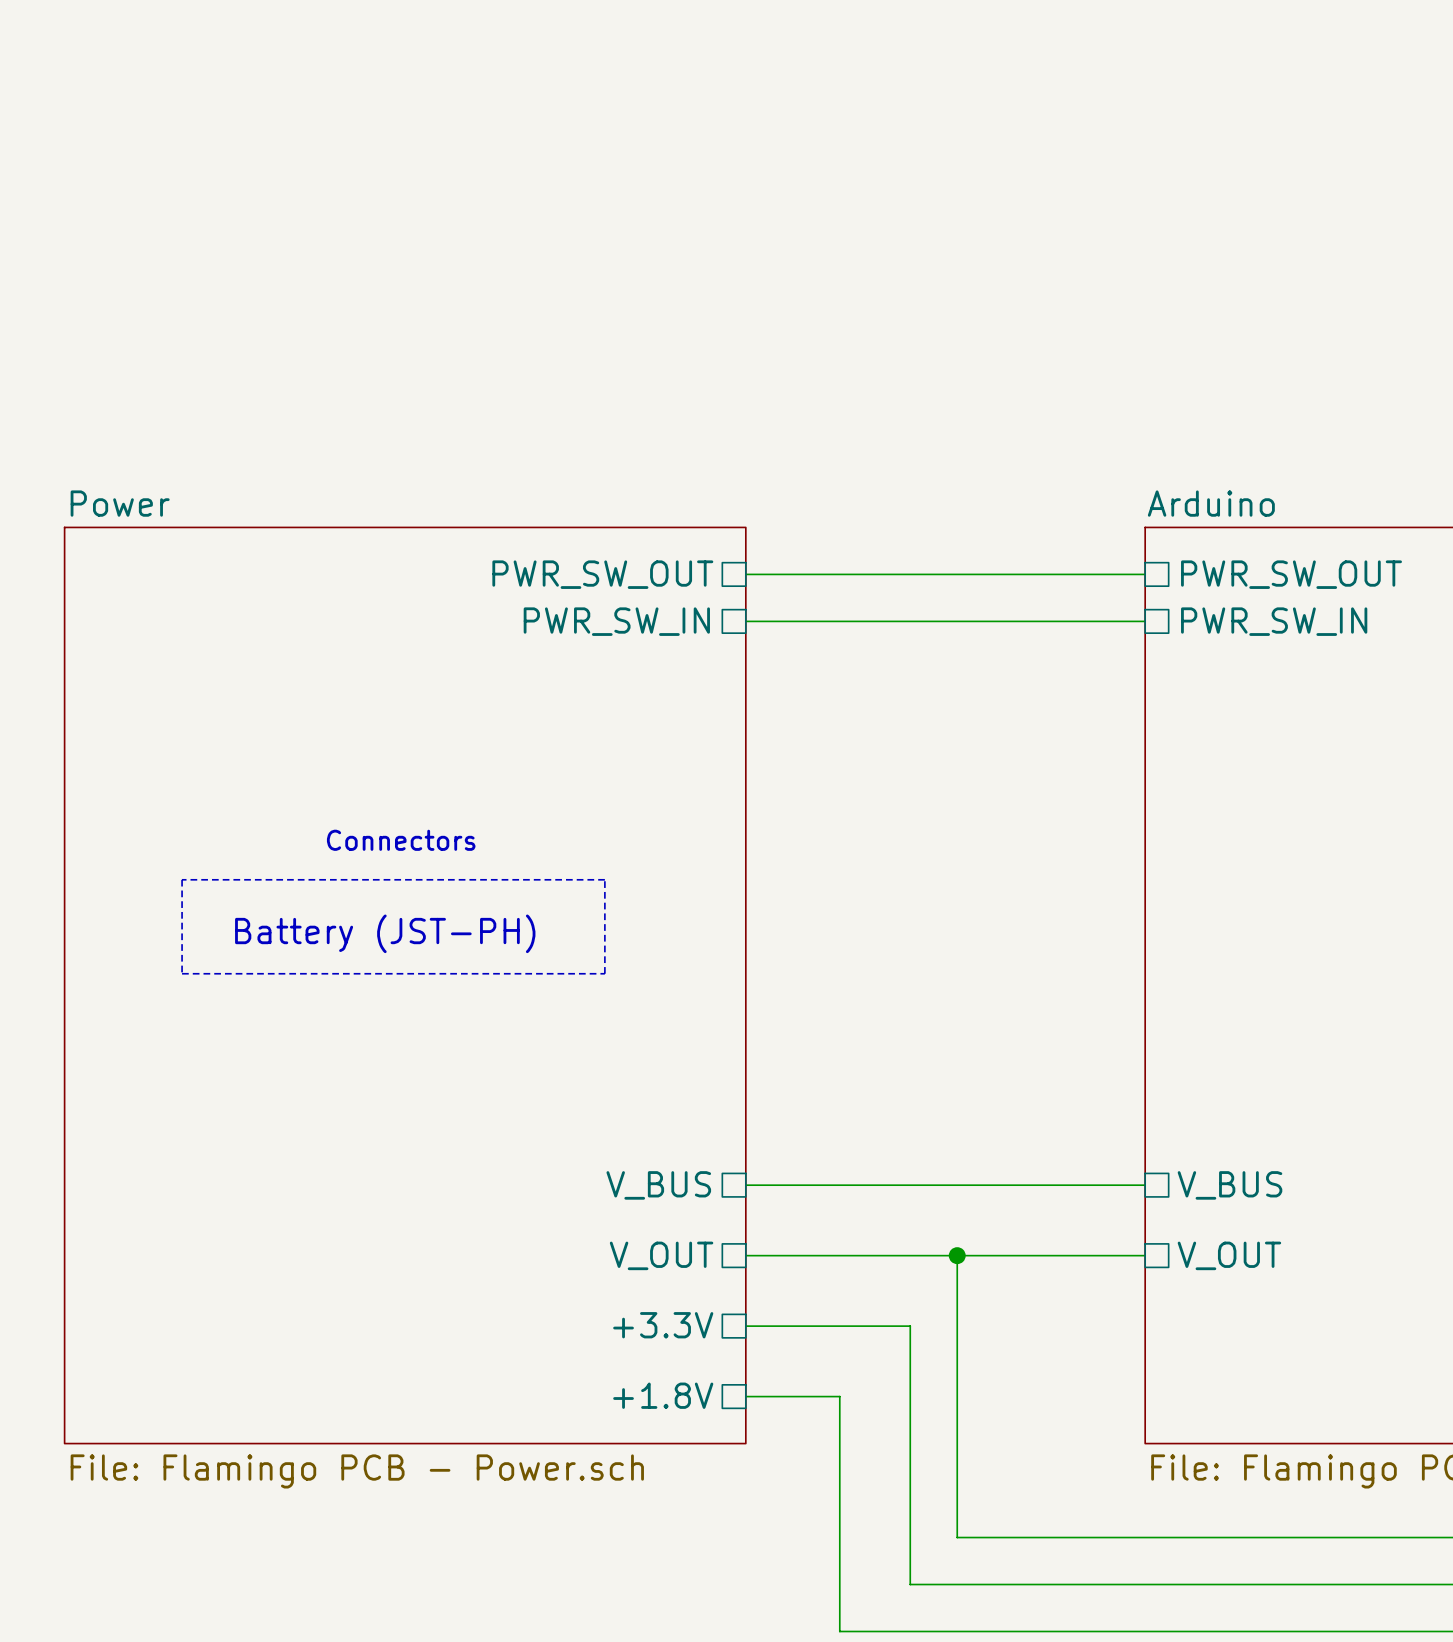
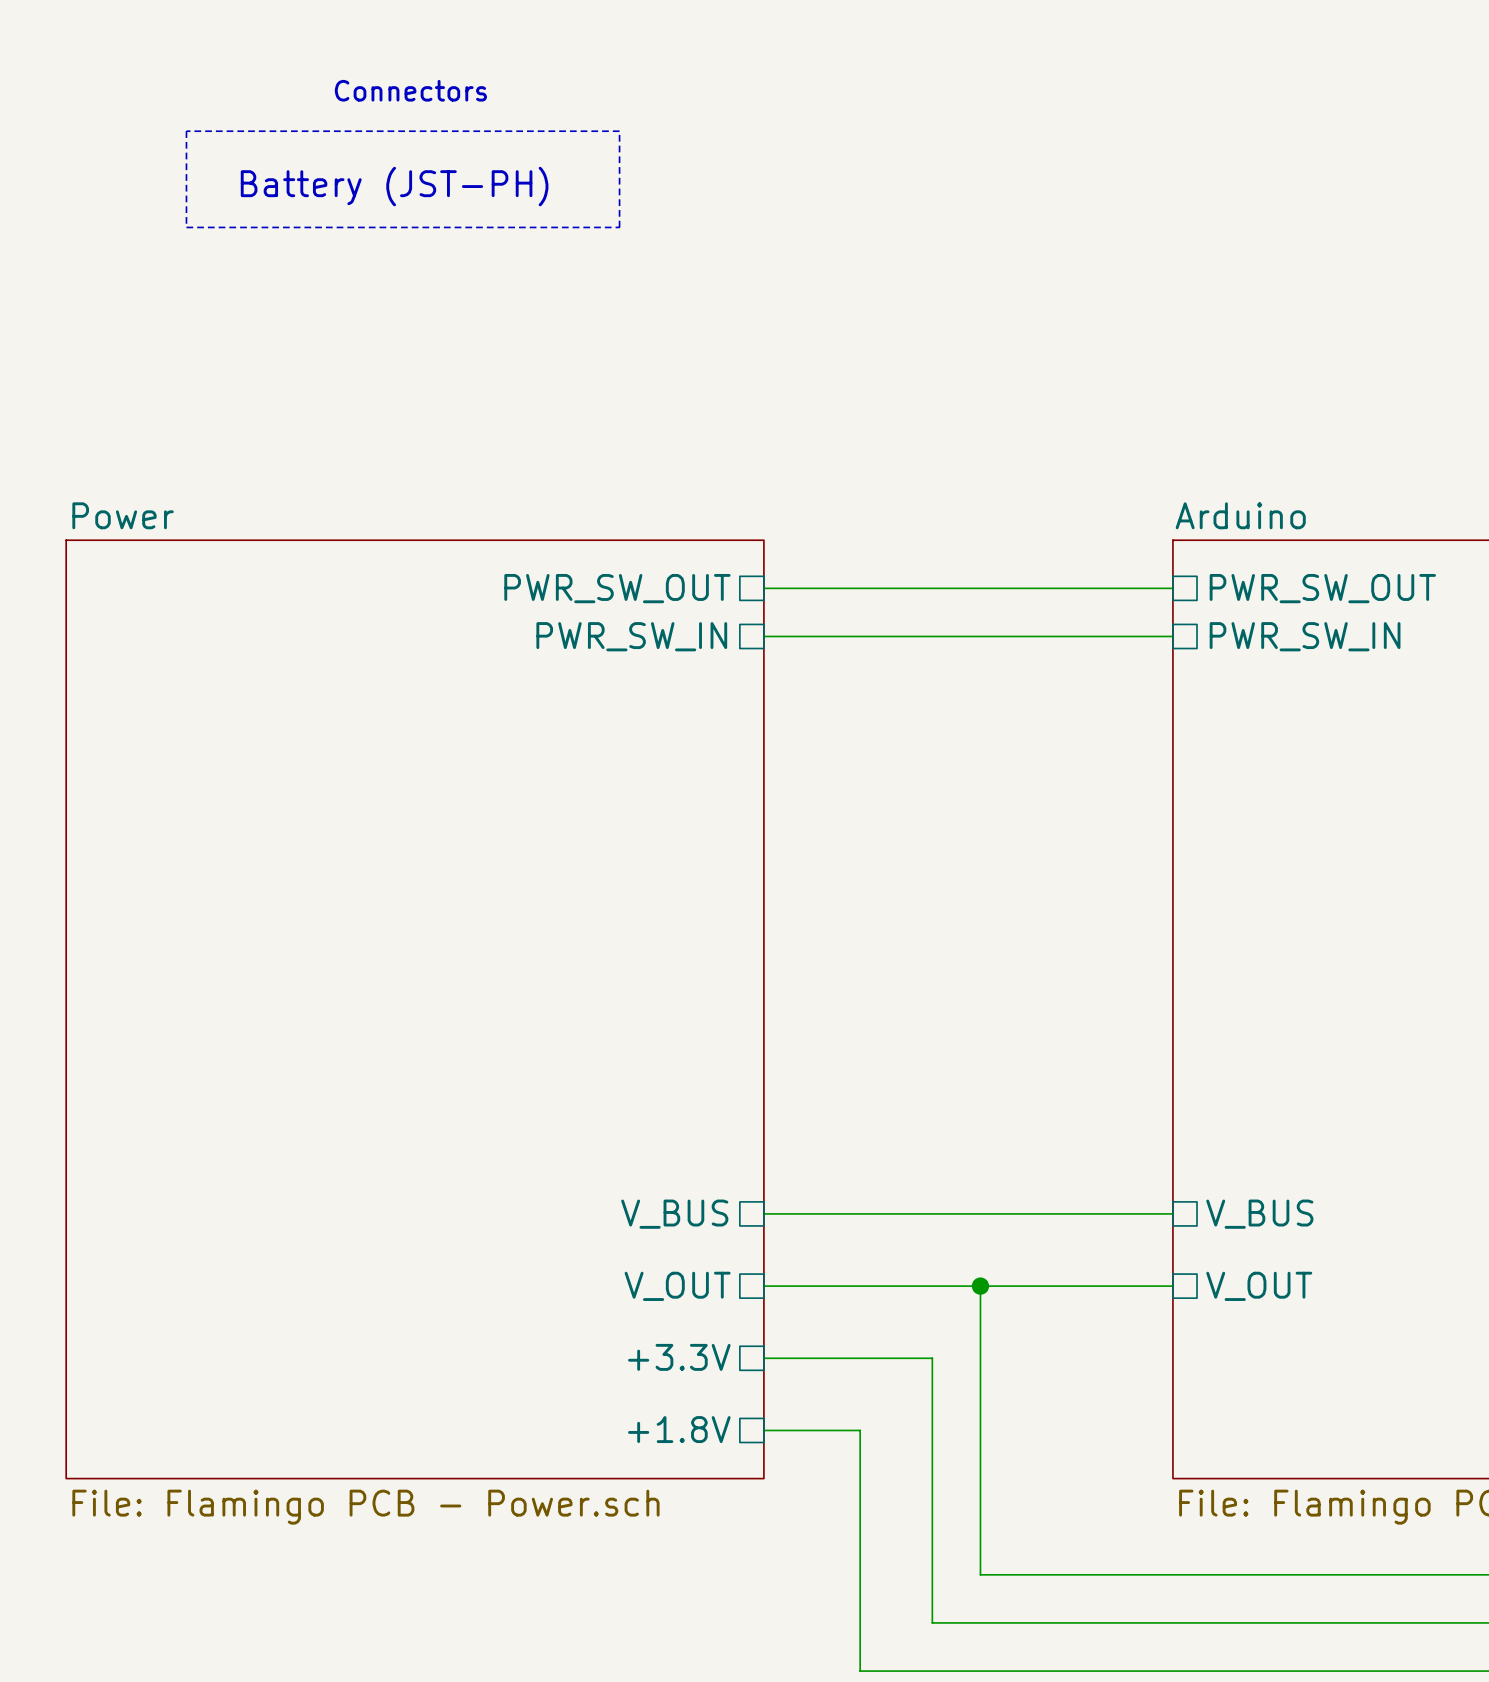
text: none -> Connectors (410, 90)
line: none -> (186, 131) (619, 131) (619, 227) (186, 227) (186, 131)
text: none -> Battery (JST-PH) (394, 186)
text: Connectors (401, 840) -> none
line: (182, 879) (604, 879) (604, 973) (182, 973) (182, 879) -> none
text: Battery (JST-PH) (385, 933) -> none

